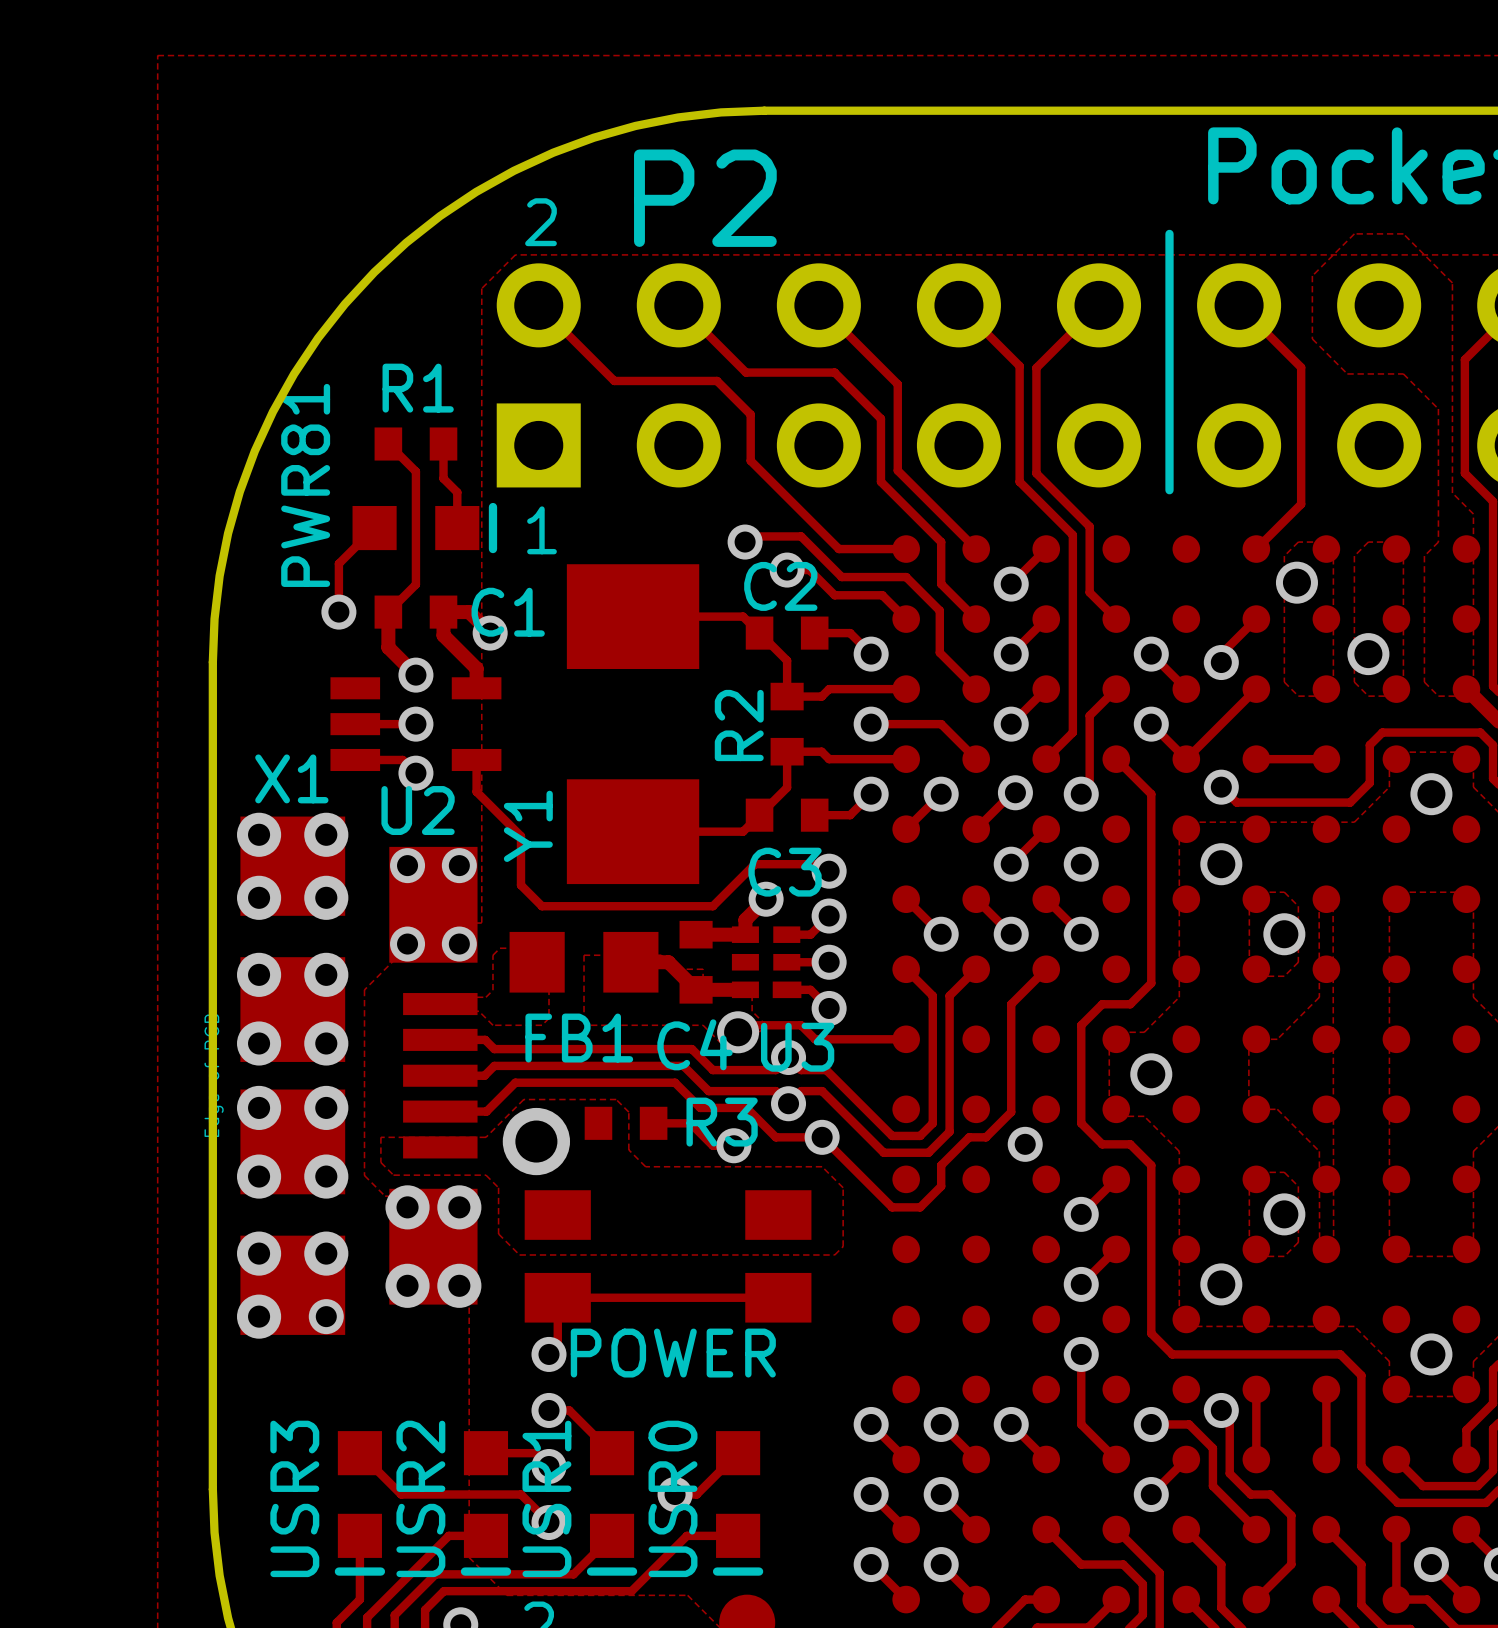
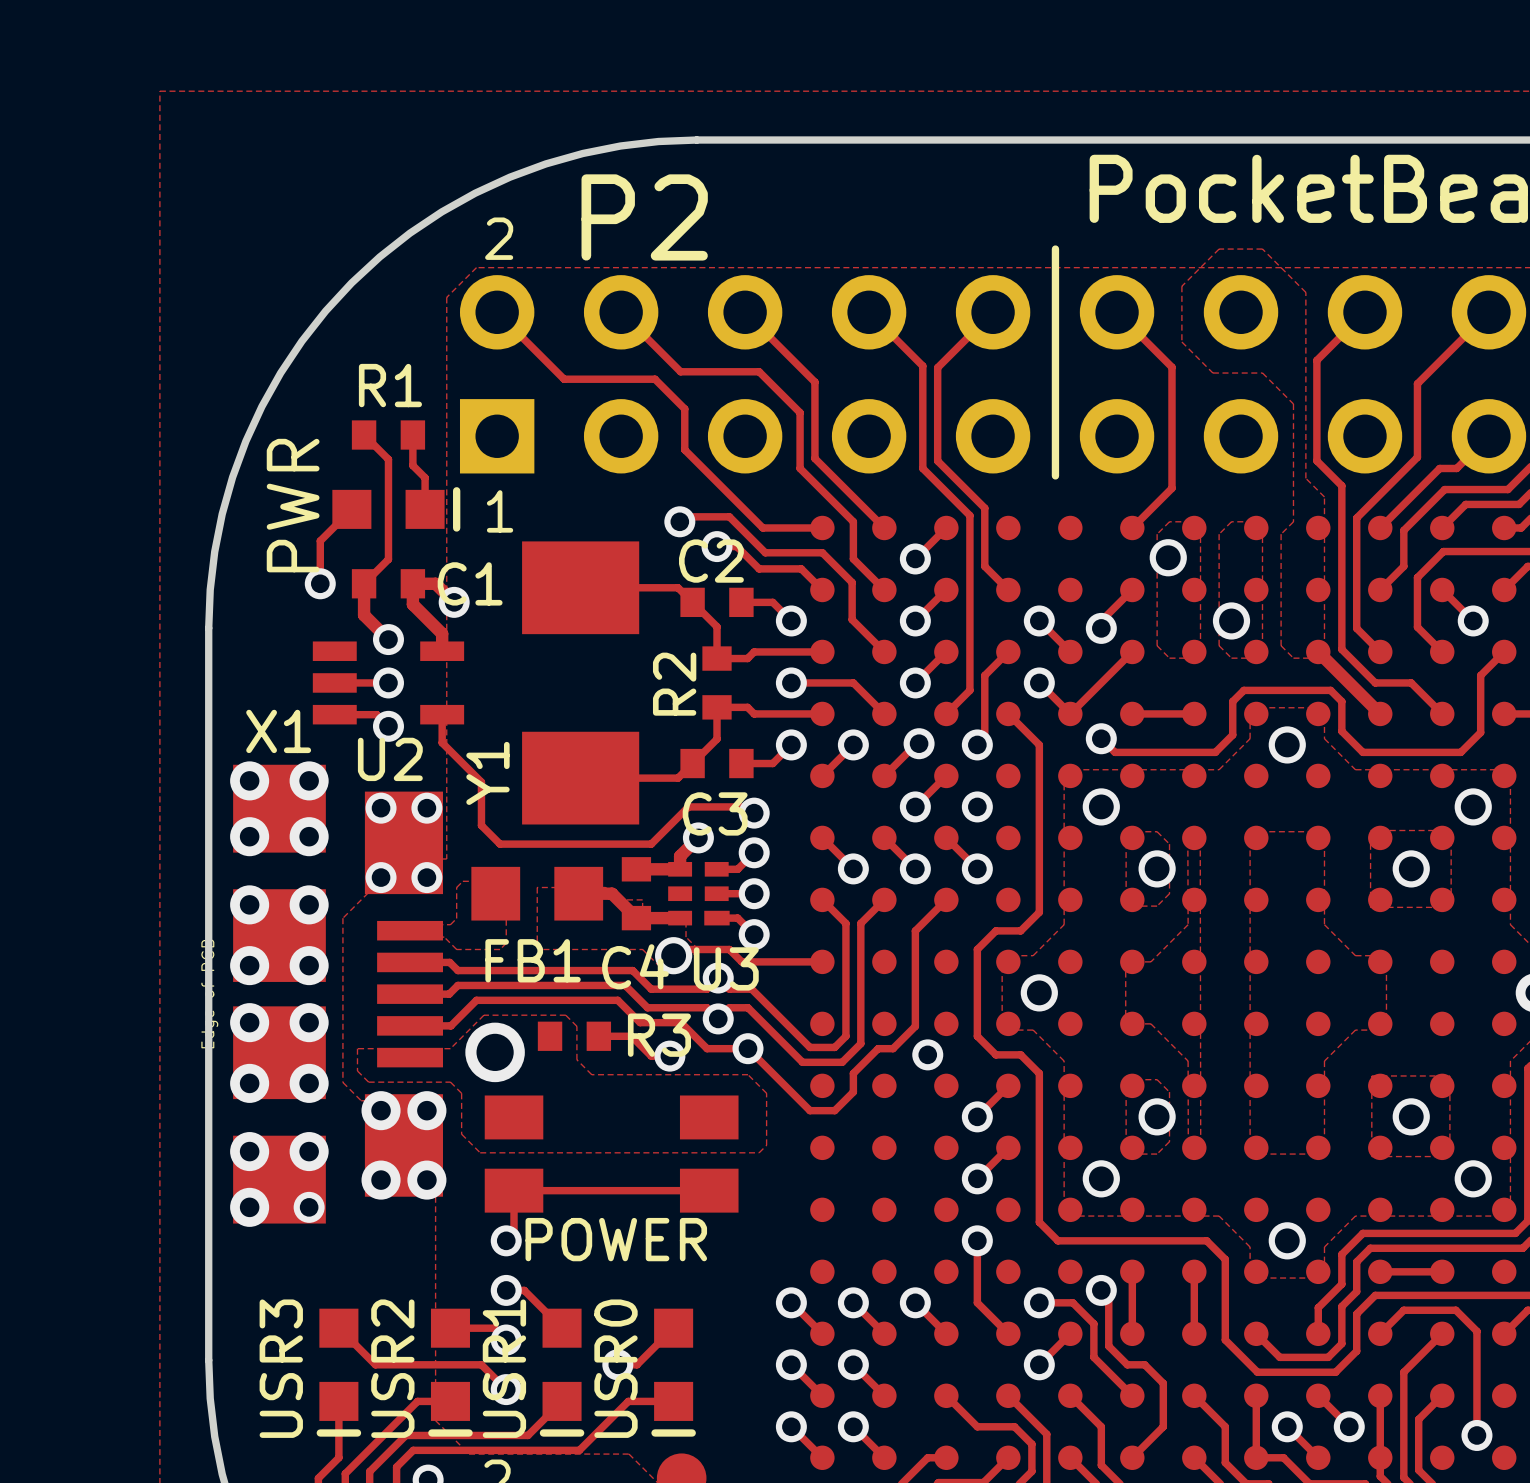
PWR81 name: PWR81 (305, 485) -> none
PWR81 value: none -> PWR (293, 505)

